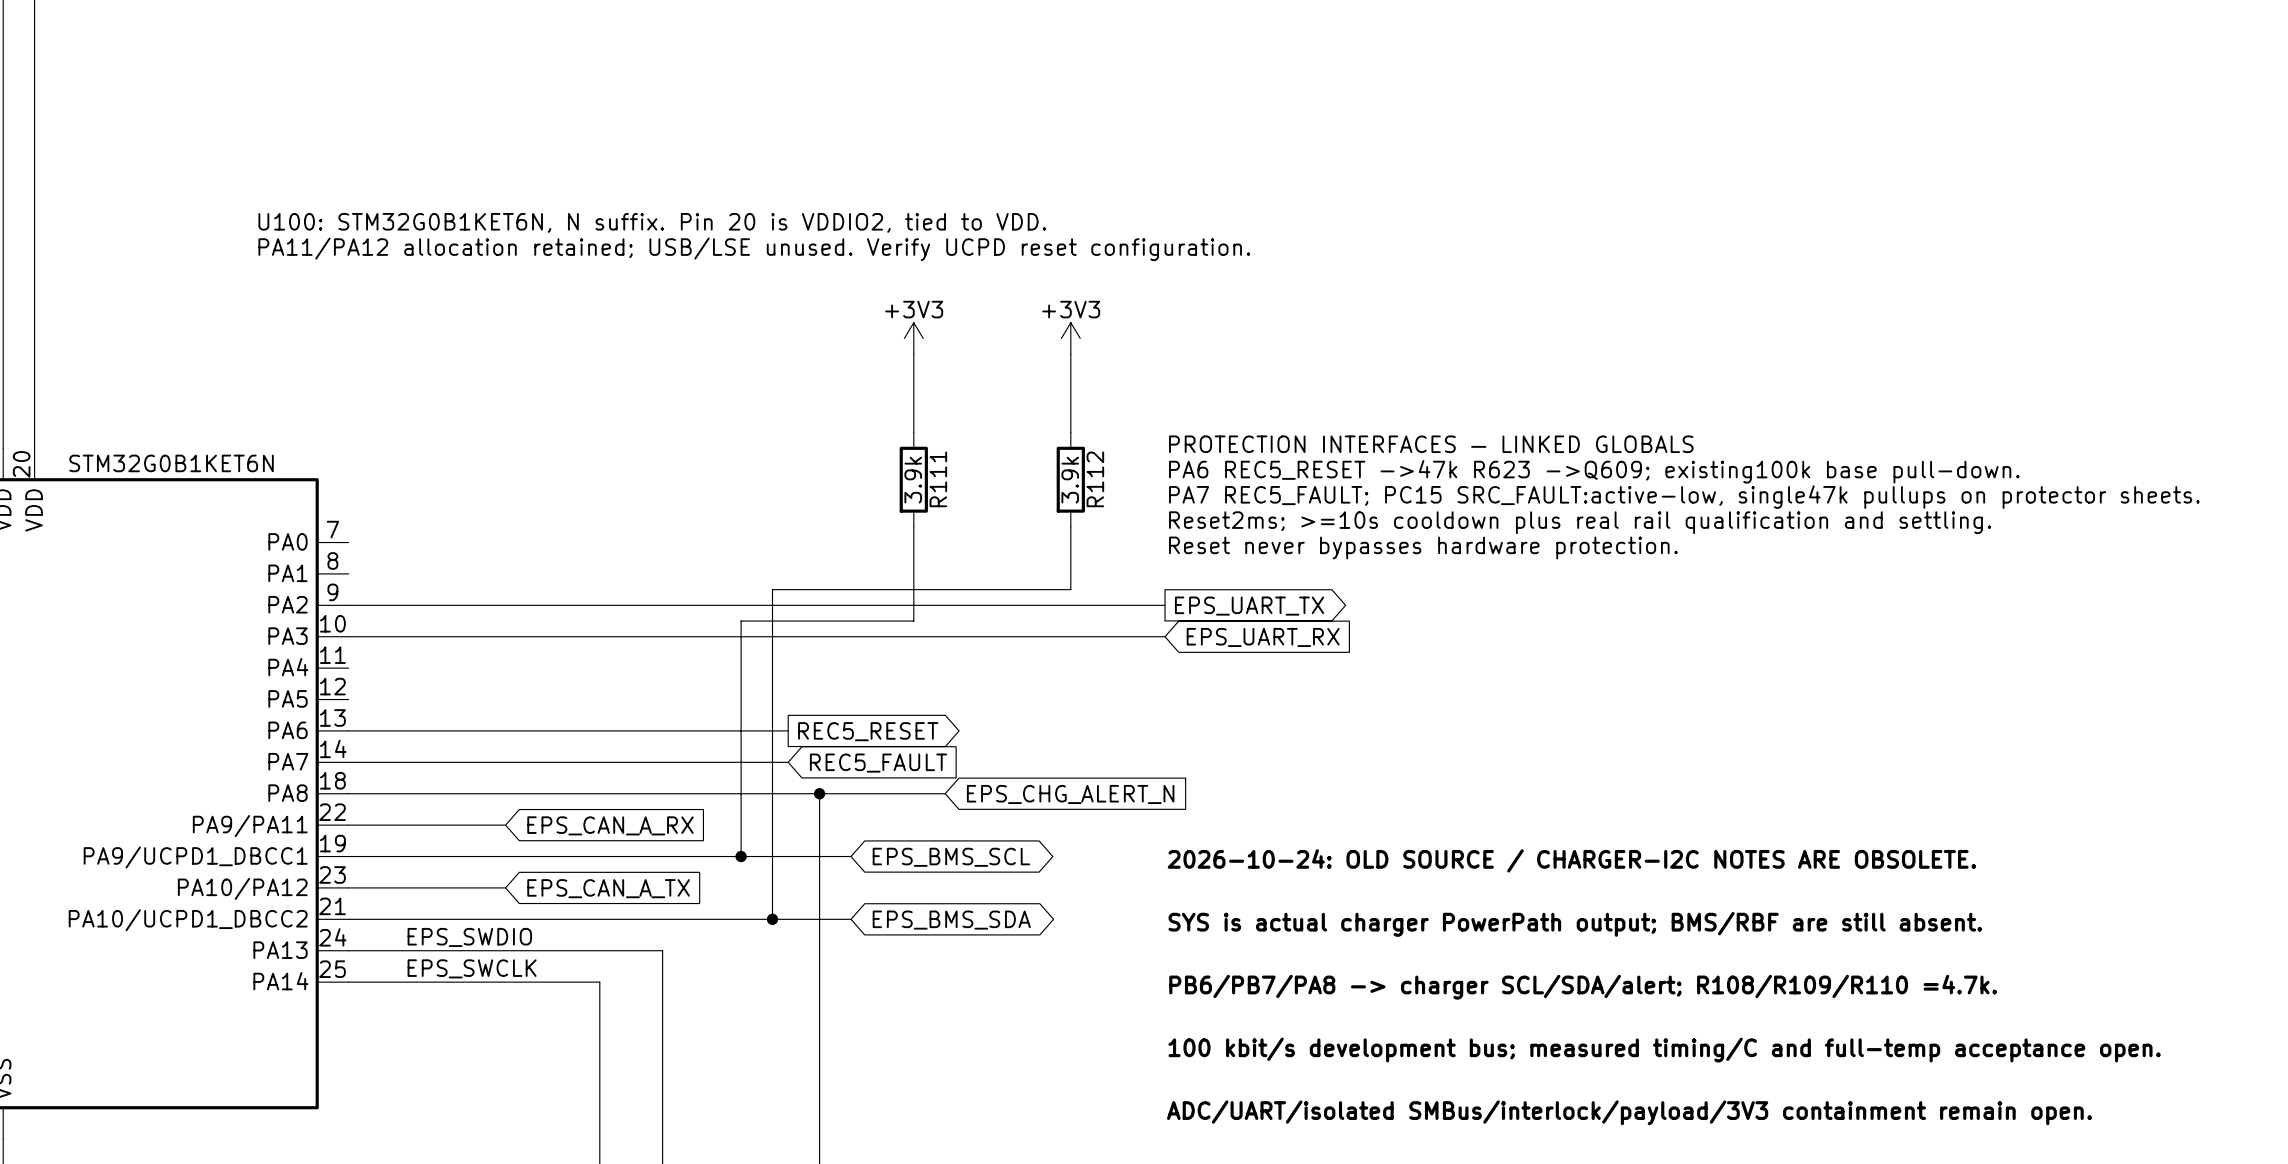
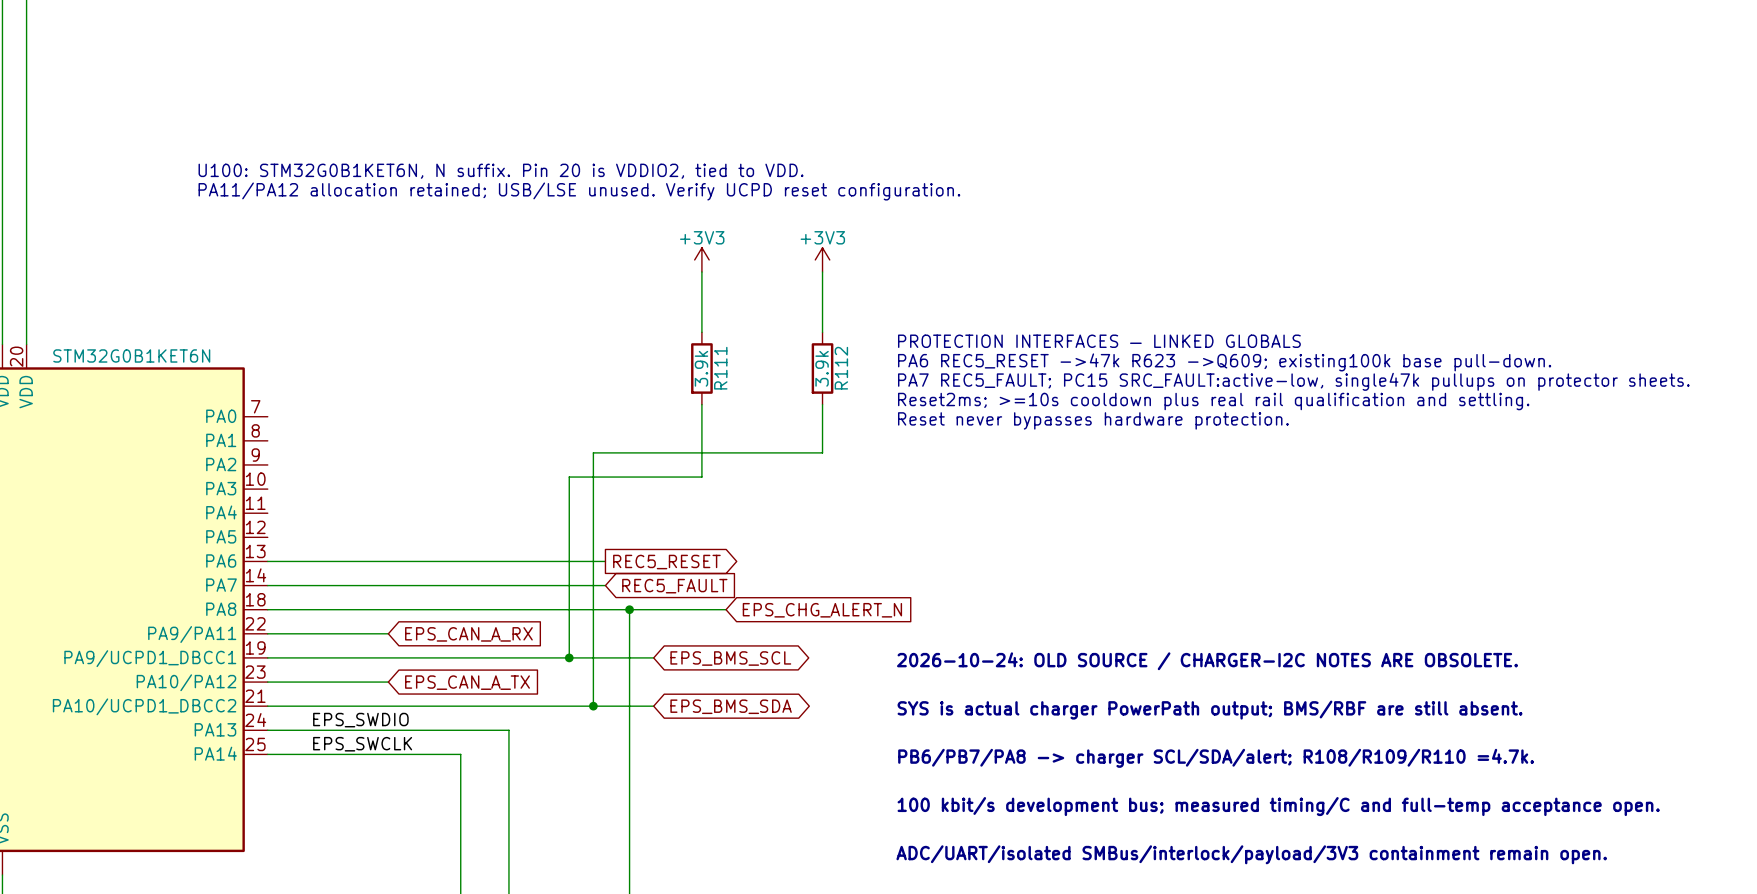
wire: (348, 605) (1165, 605) -> none
global label: EPS_UART_TX (1249, 606) -> none
wire: (348, 636) (1165, 636) -> none
global label: EPS_UART_RX (1263, 637) -> none

